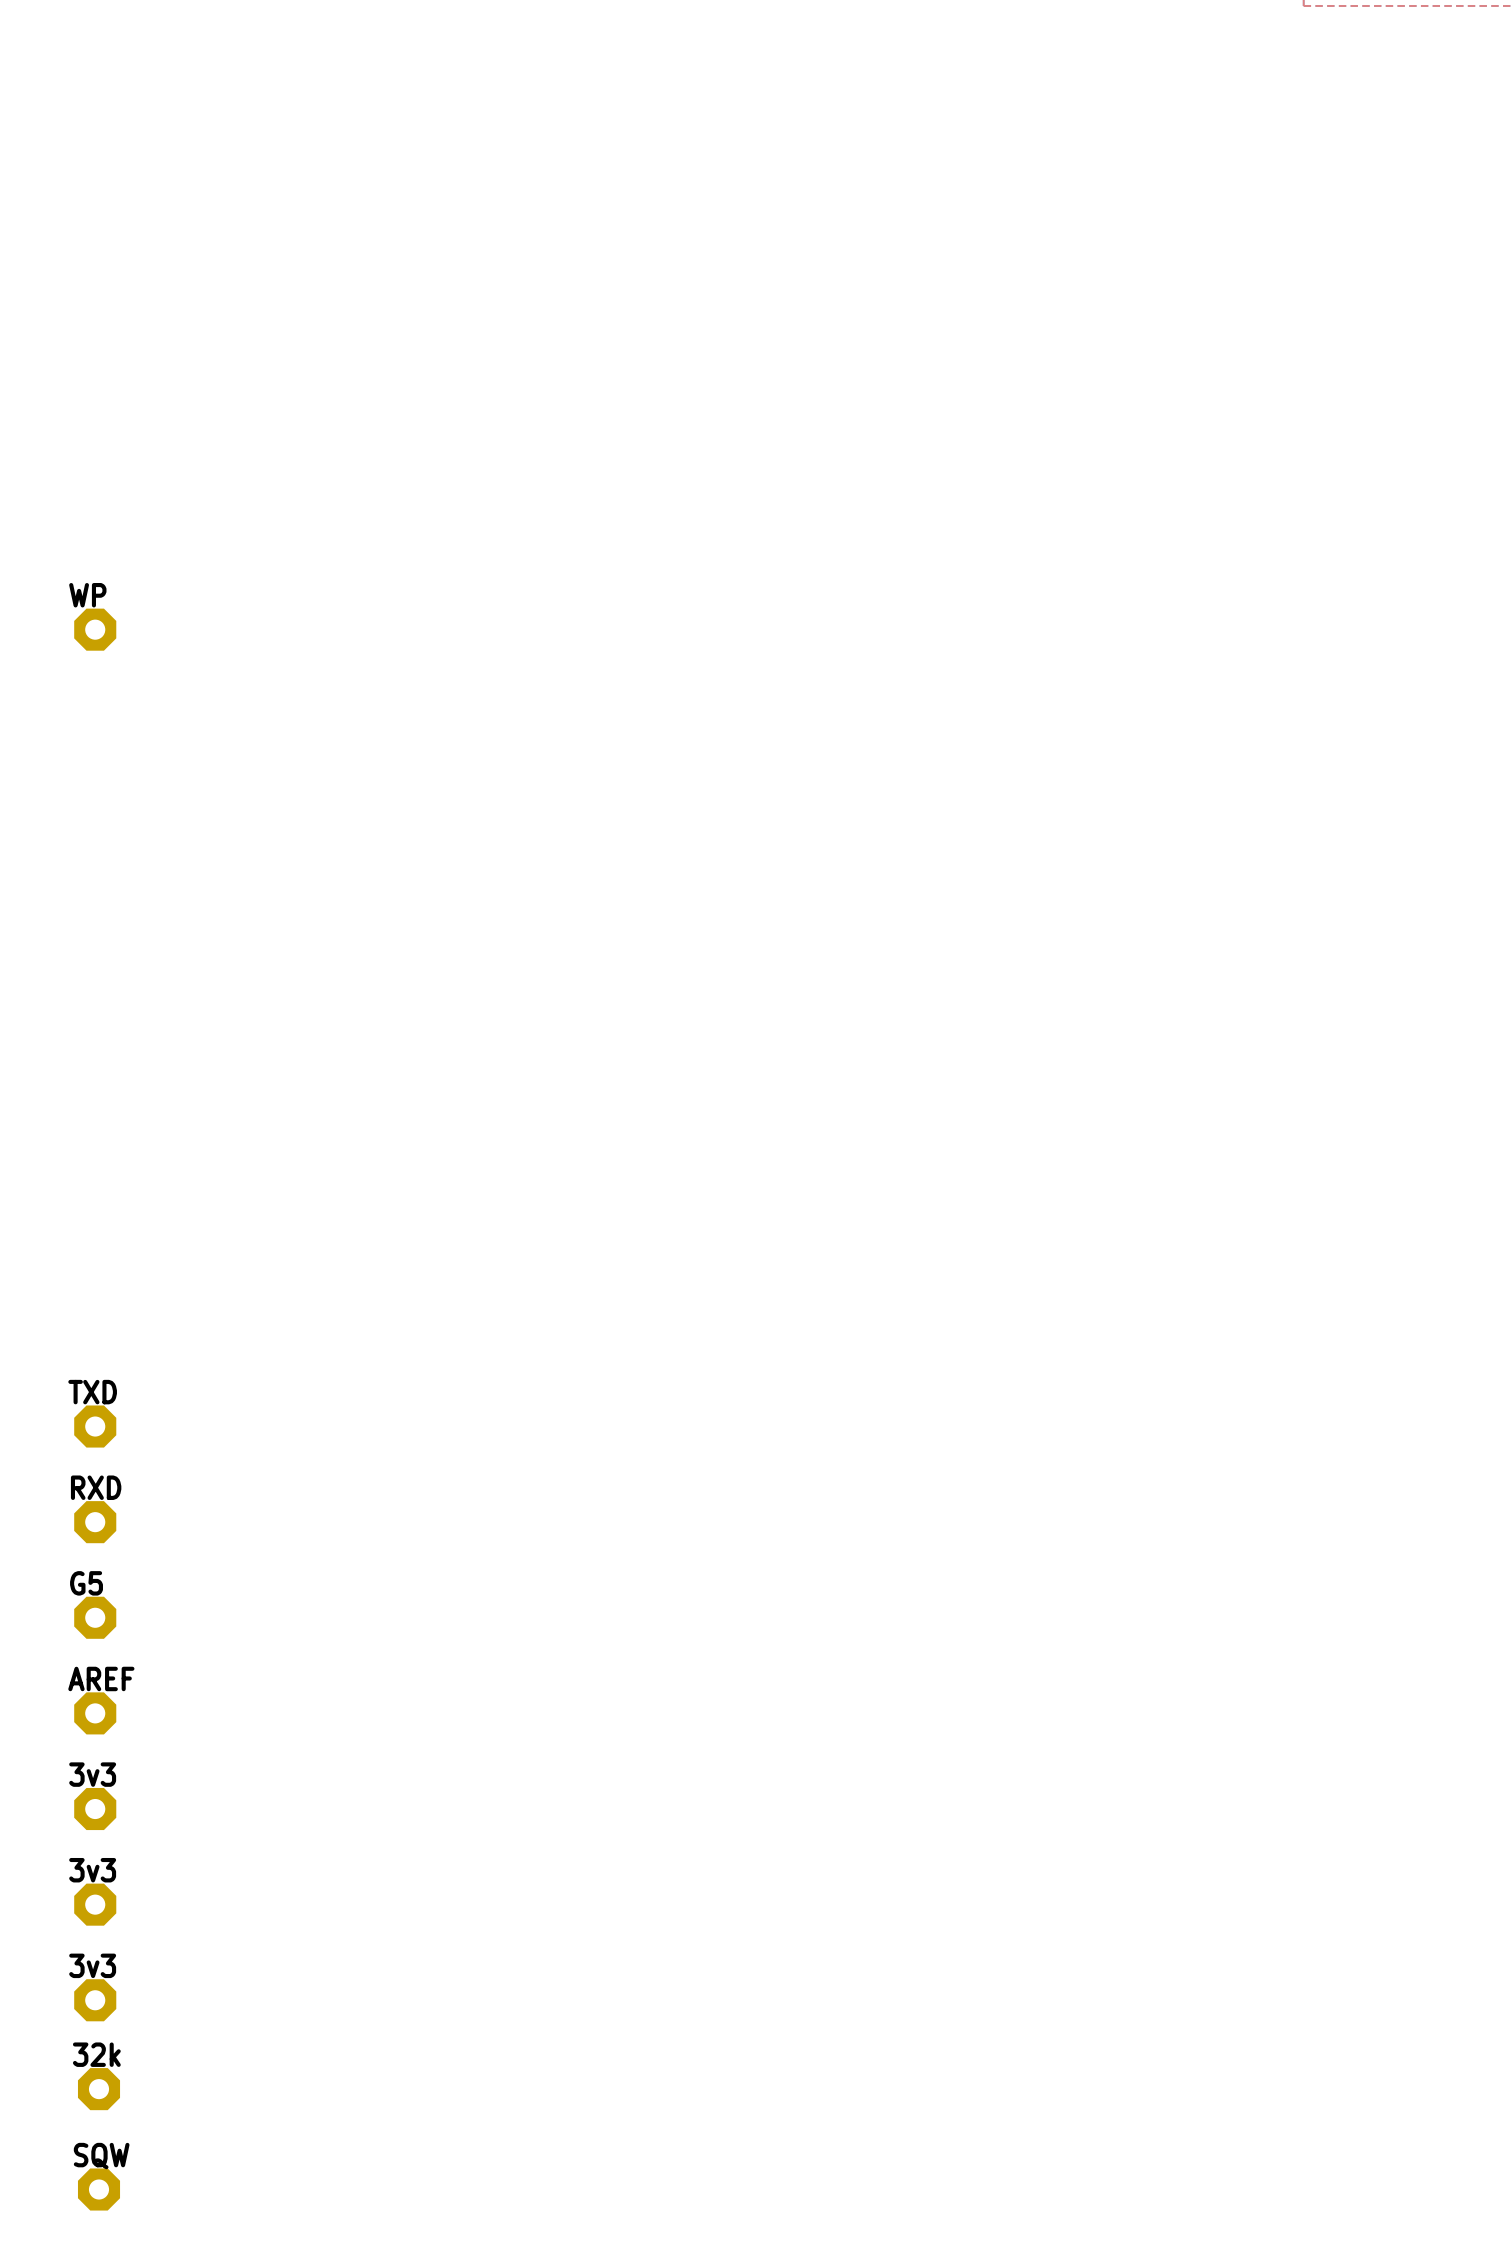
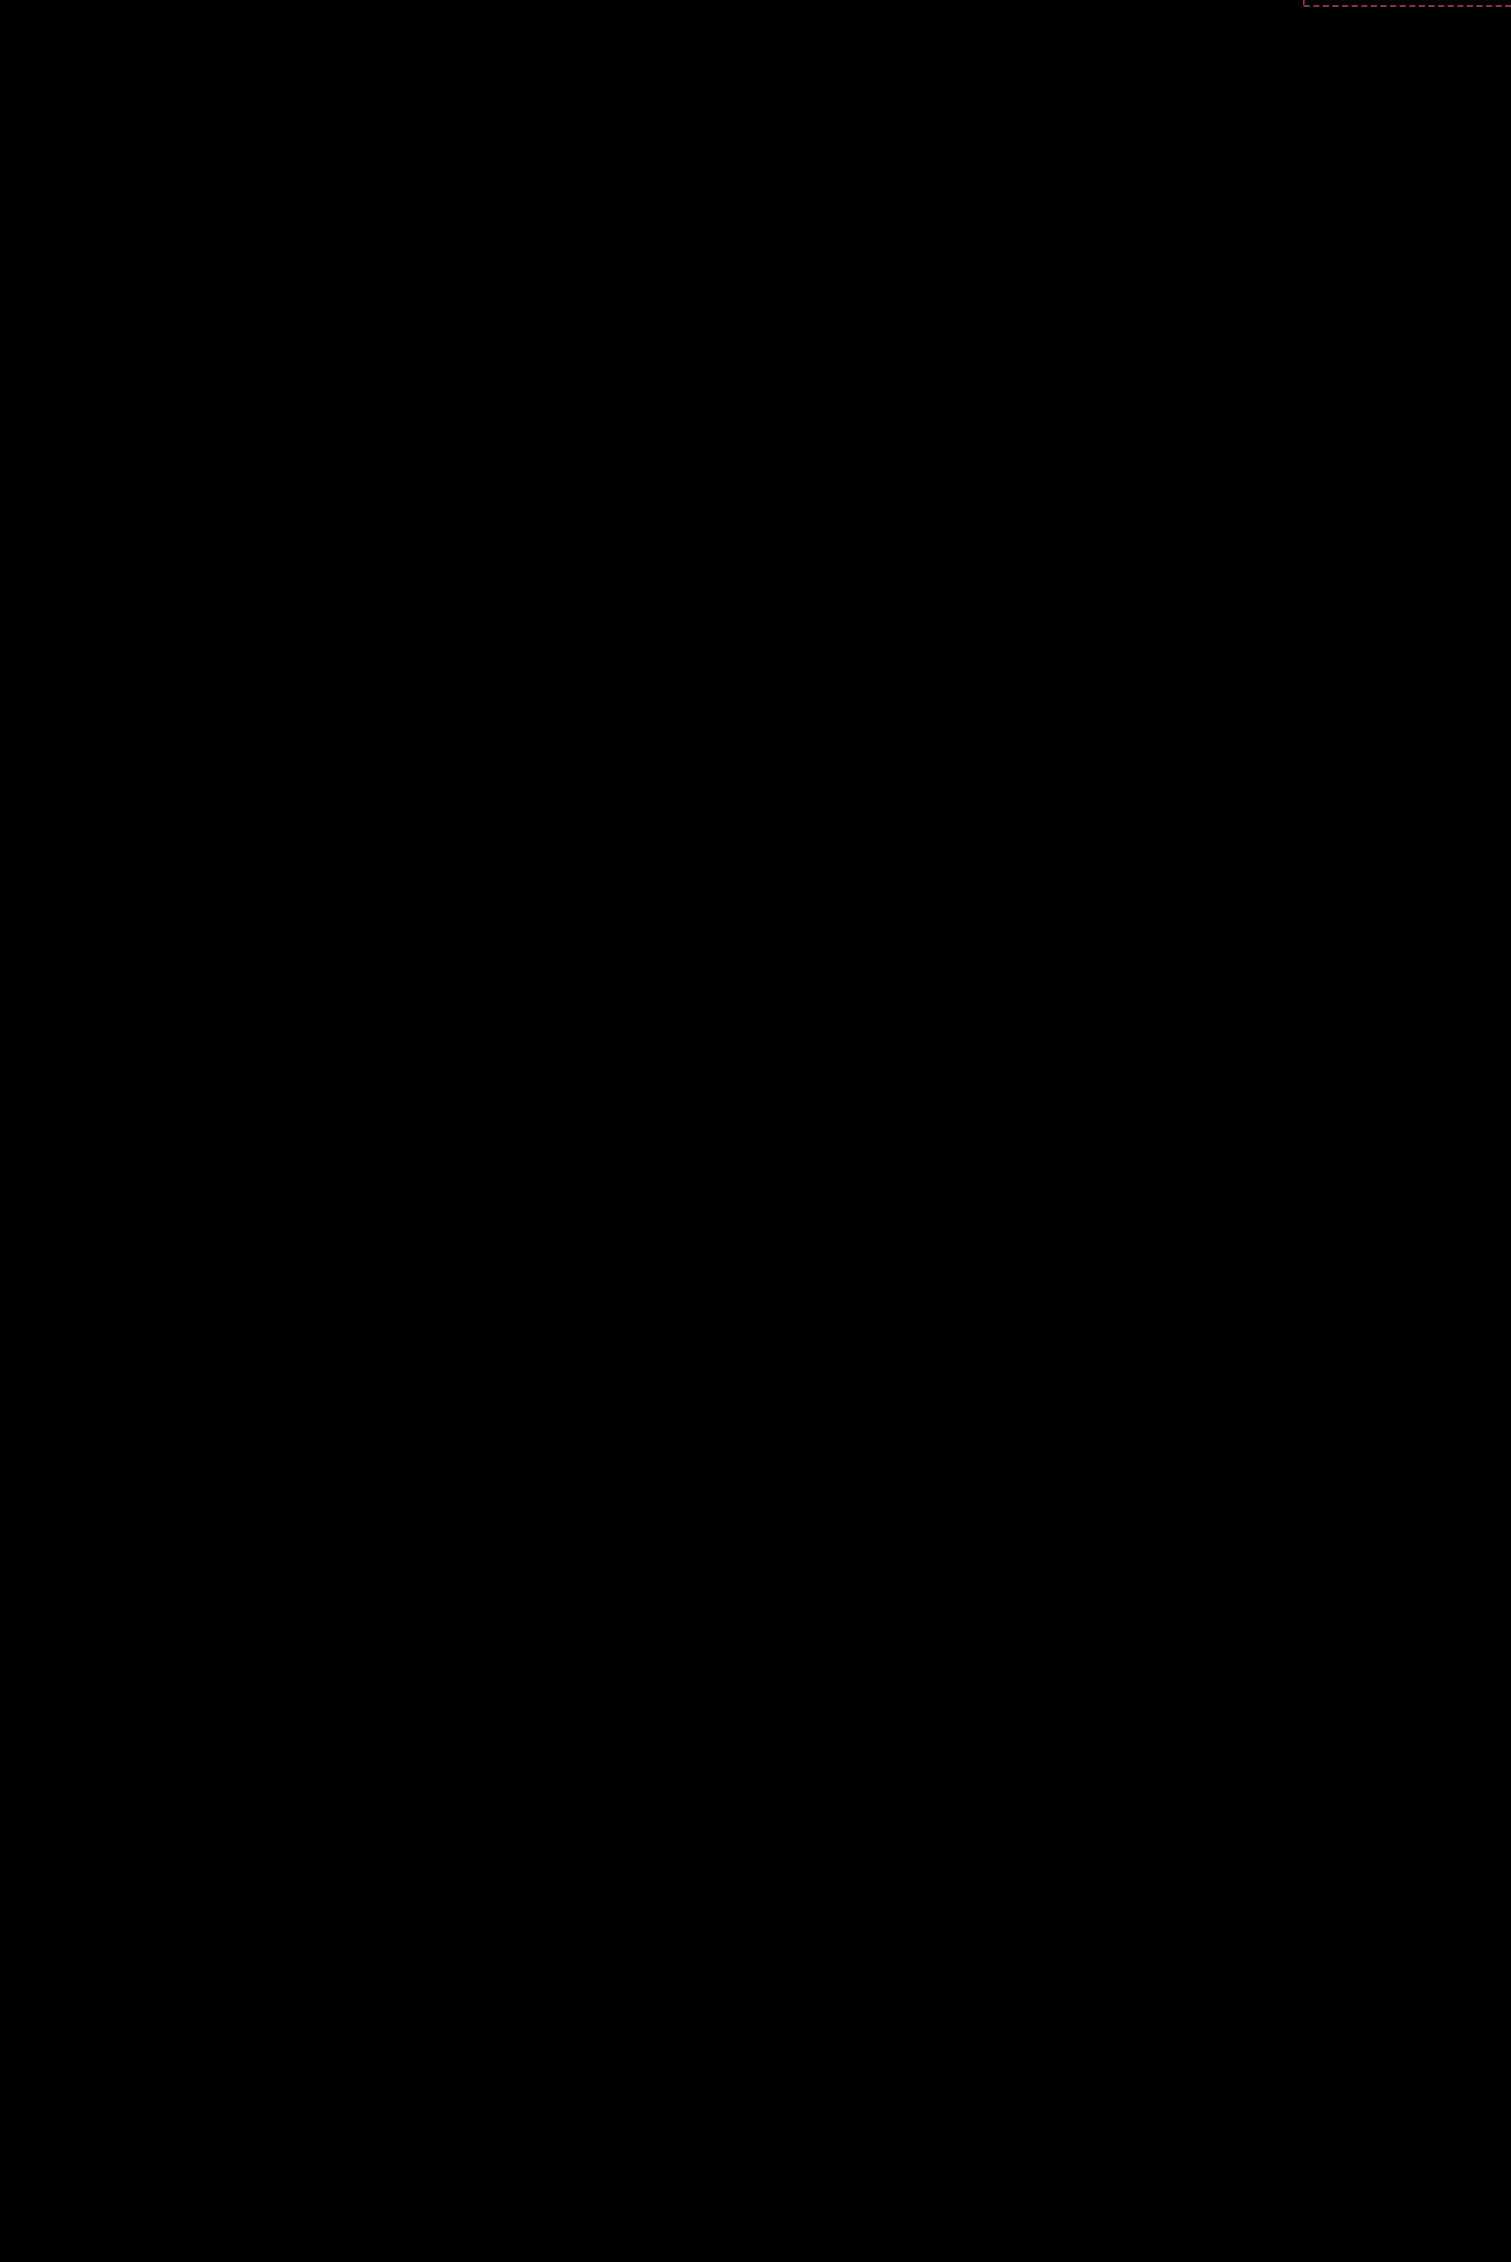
part: WP (95, 629) -> none
part: TXD (95, 1426) -> none
part: RXD (95, 1522) -> none
part: G5 (95, 1617) -> none
part: AREF (95, 1713) -> none
part: 3v3 (95, 1809) -> none
part: 3v3 (95, 1904) -> none
part: 3v3 (95, 2000) -> none
part: 32k (99, 2089) -> none
part: SQW (99, 2189) -> none

